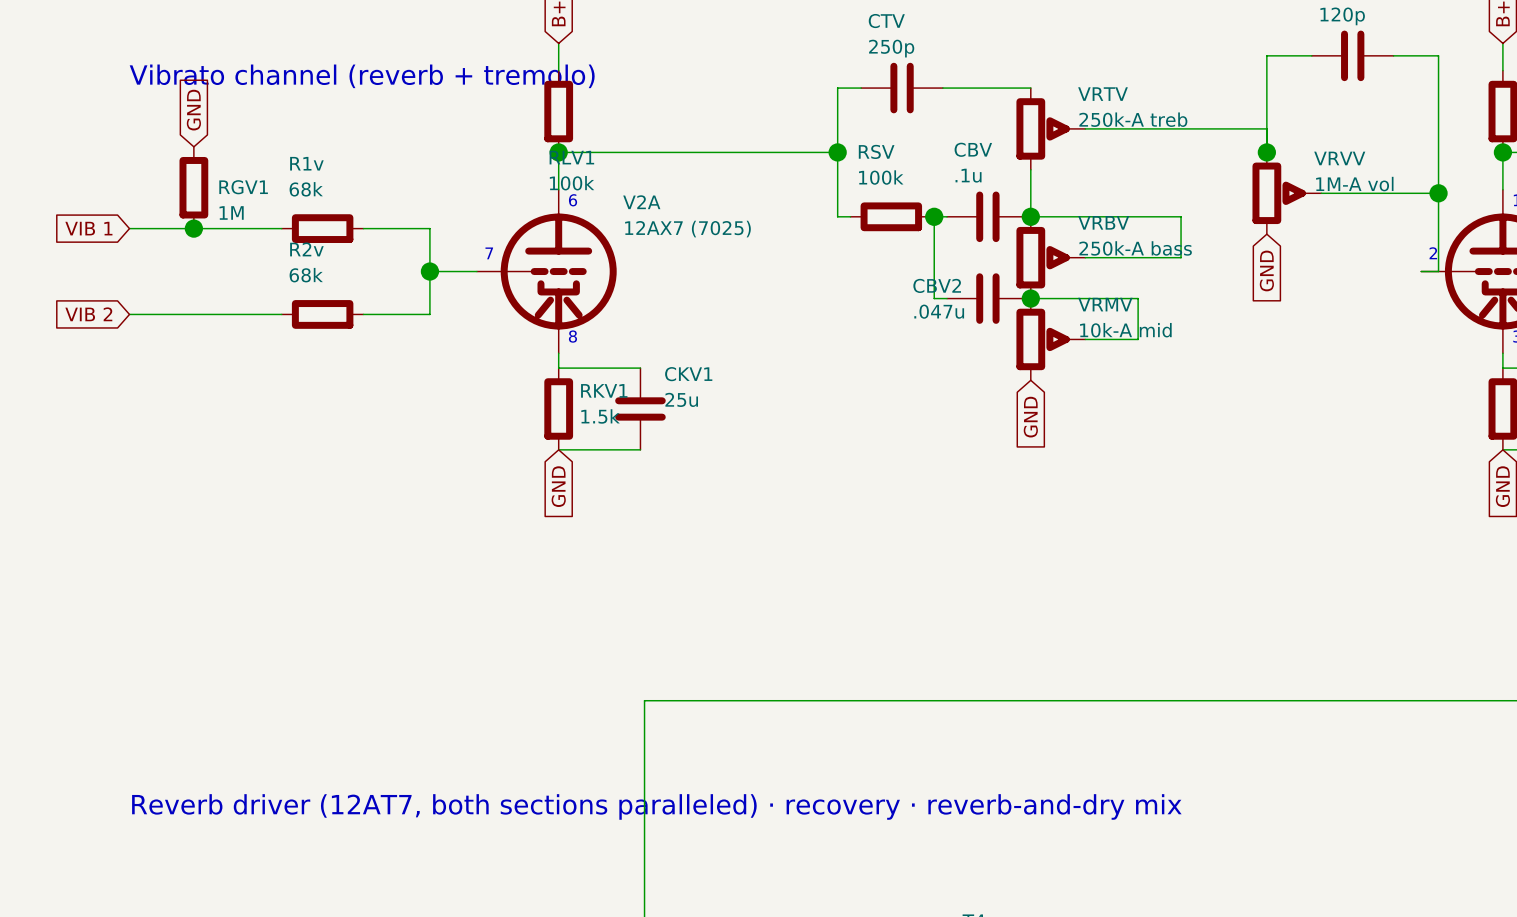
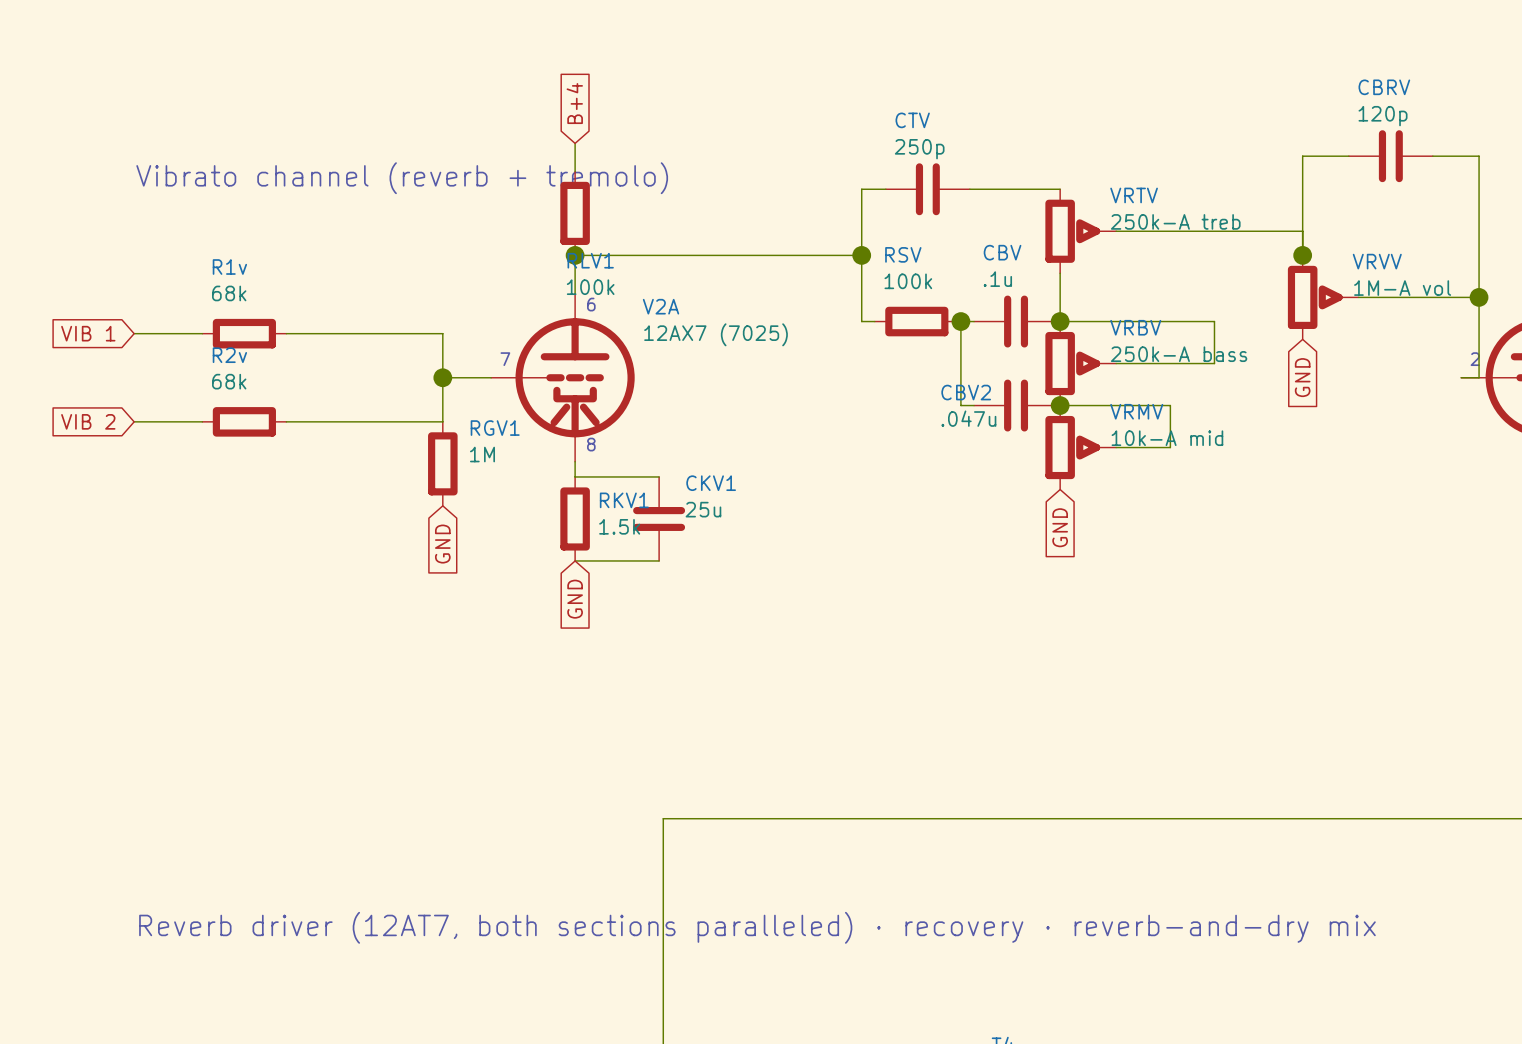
global label: GND (193, 110) -> none
RGV1 position: (193, 187) -> (442, 463)
RGV1 name position: RGV1 (243, 187) -> RGV1 (495, 428)
RGV1 value position: 1M (231, 212) -> 1M (482, 454)
junction: (193, 228) -> none
wire: (195, 228) (277, 228) -> (290, 333) (374, 333)
R1v position: (322, 228) -> (244, 333)
wire: (195, 314) (277, 314) -> (290, 421) (374, 421)
R2v position: (322, 314) -> (244, 421)
global label: none -> GND (442, 544)

